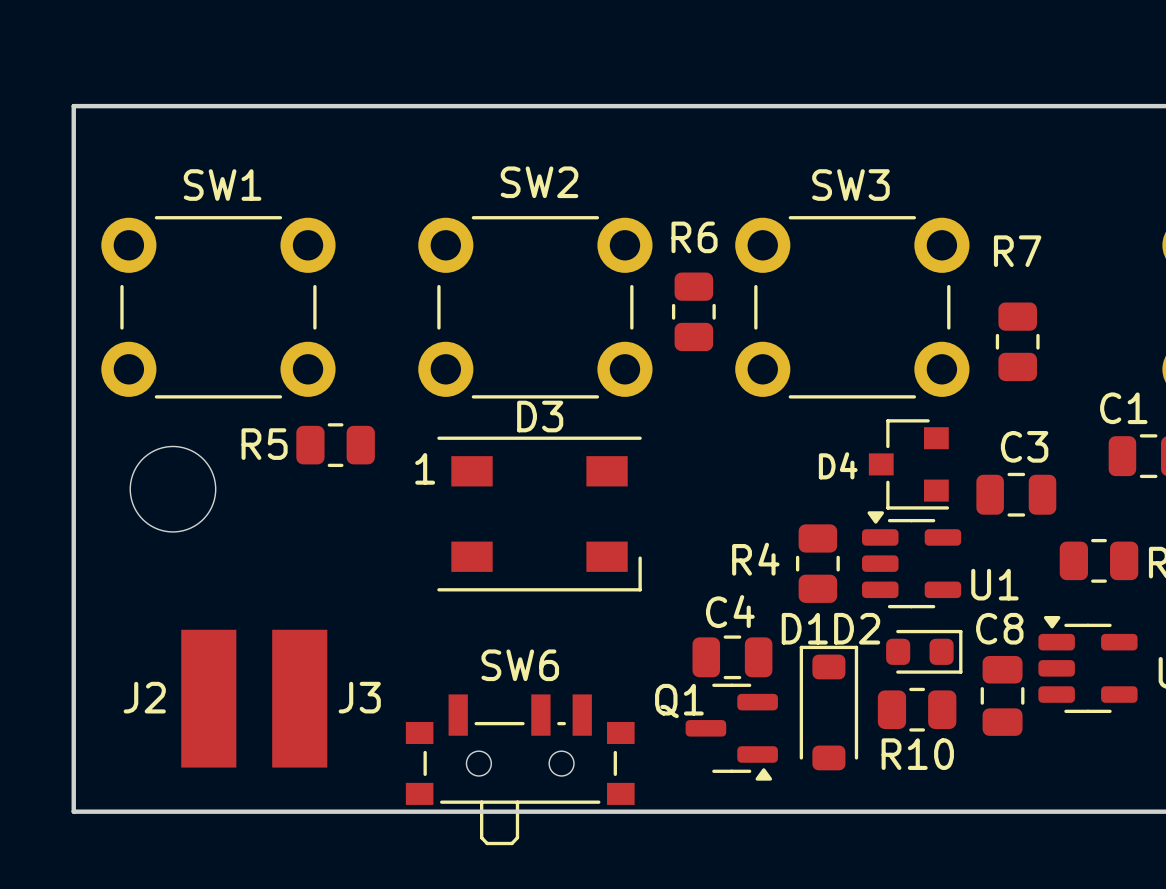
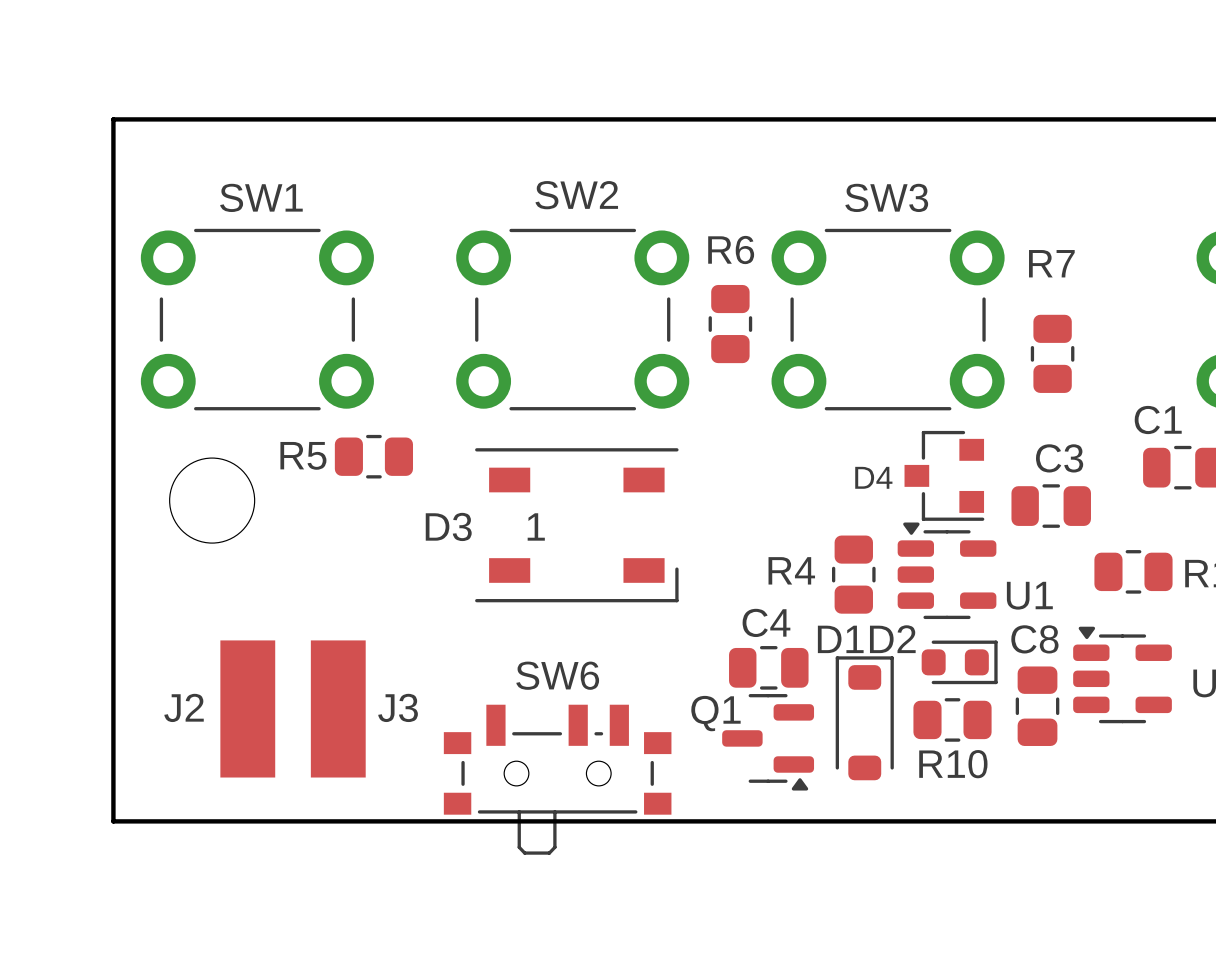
D3 name position: D3 (540, 416) -> D3 (448, 526)
D3 footprint: [437, 436, 642, 592] -> [475, 448, 679, 603]

